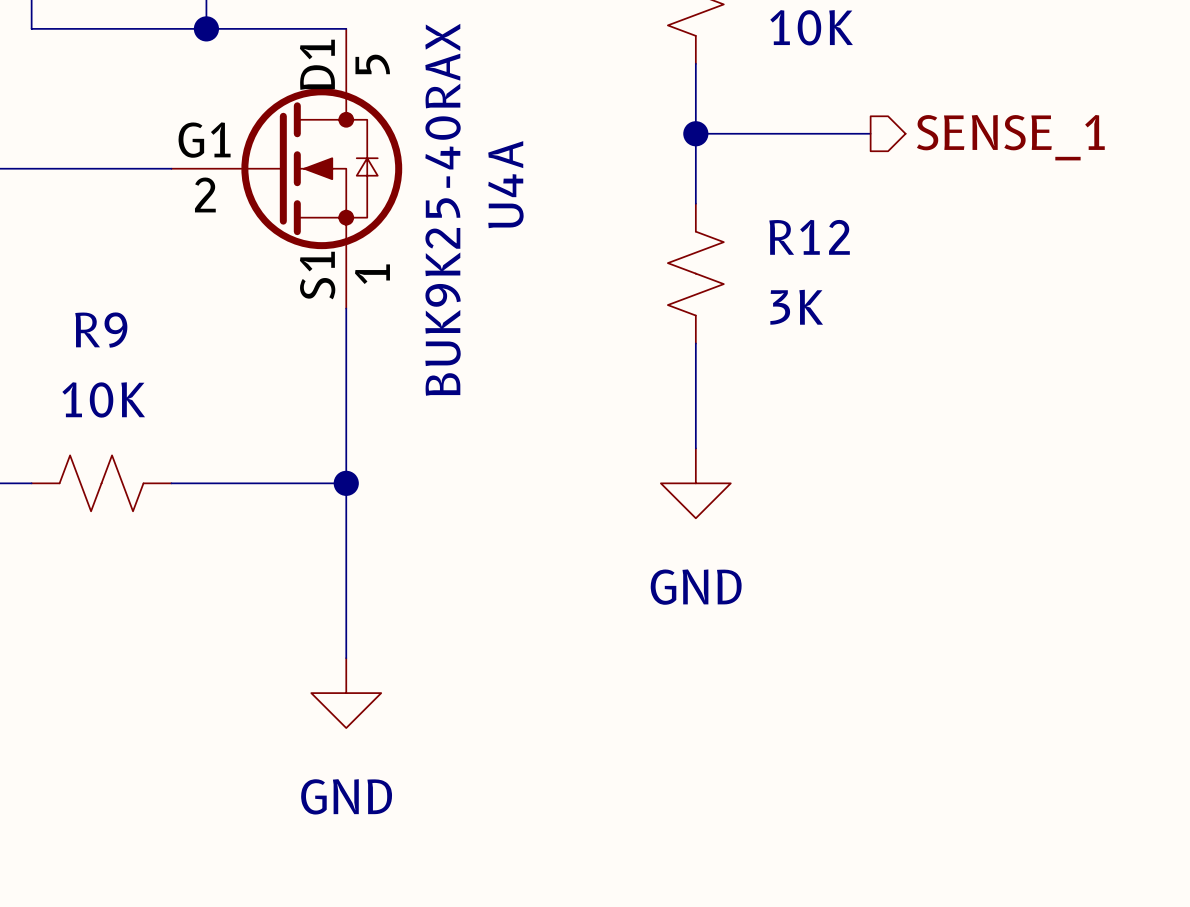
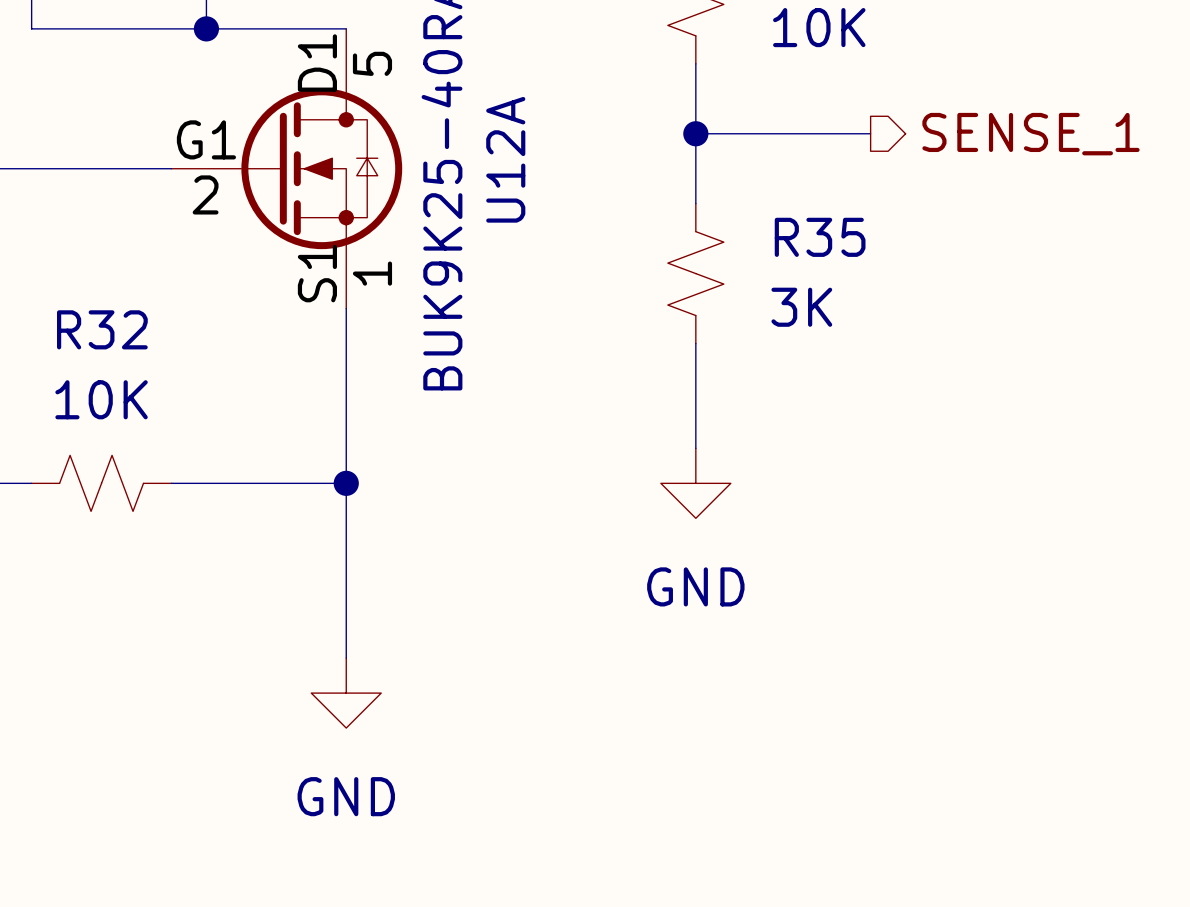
U4A name: U4A (505, 184) -> U12A (505, 159)
R12 name: R12 (809, 237) -> R35 (820, 237)
R9 name: R9 (101, 330) -> R32 (102, 329)

